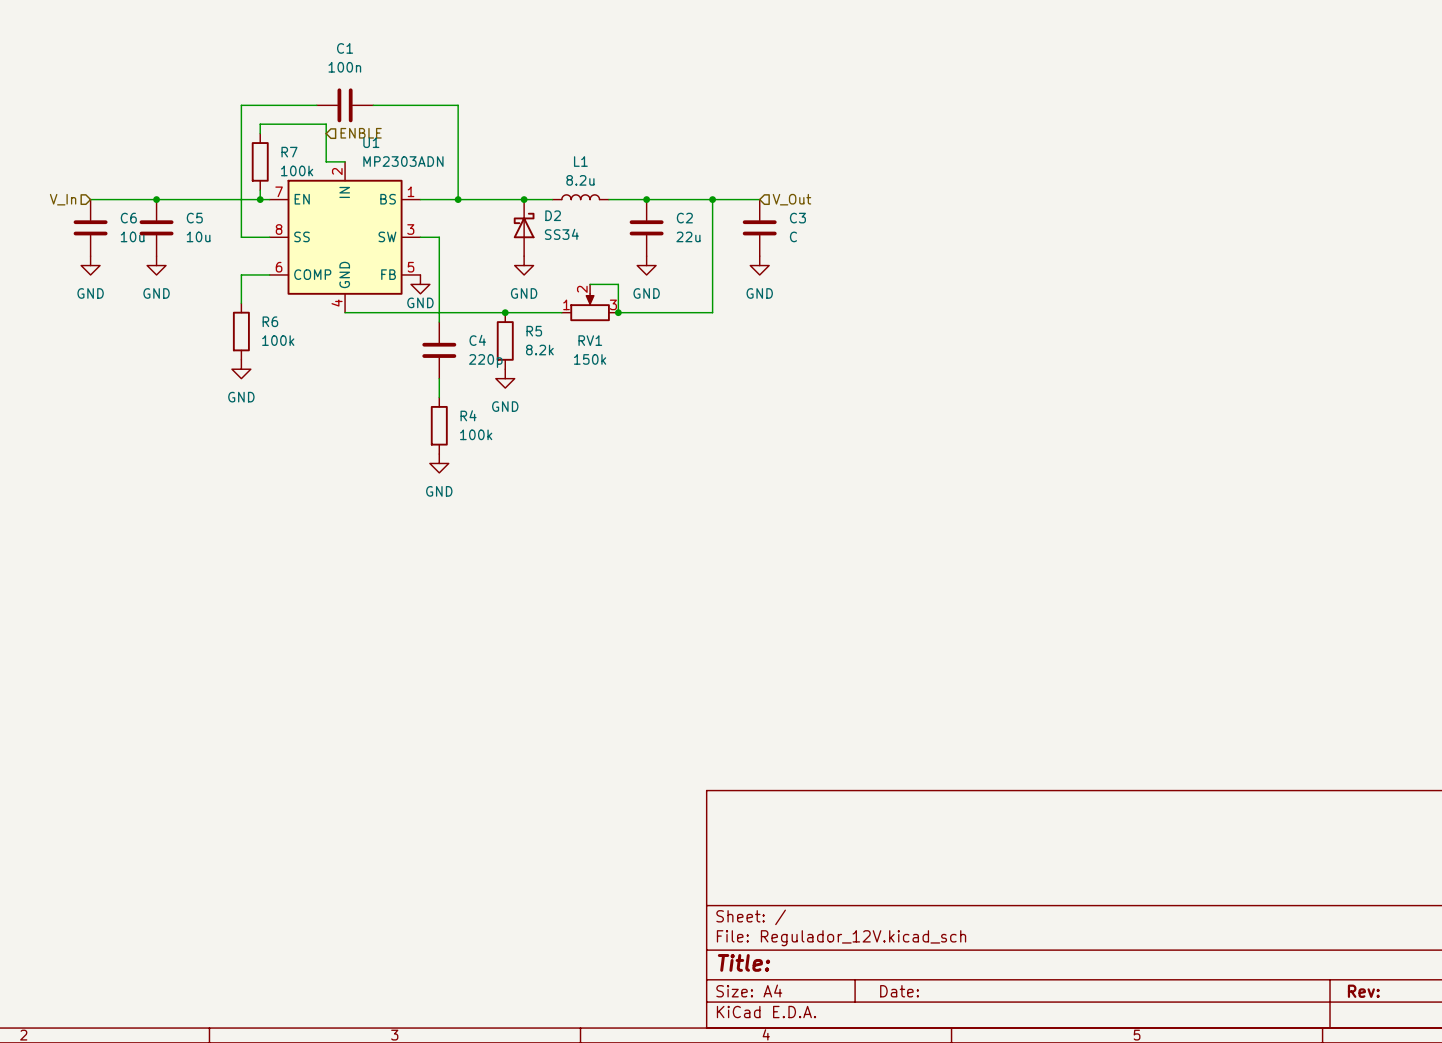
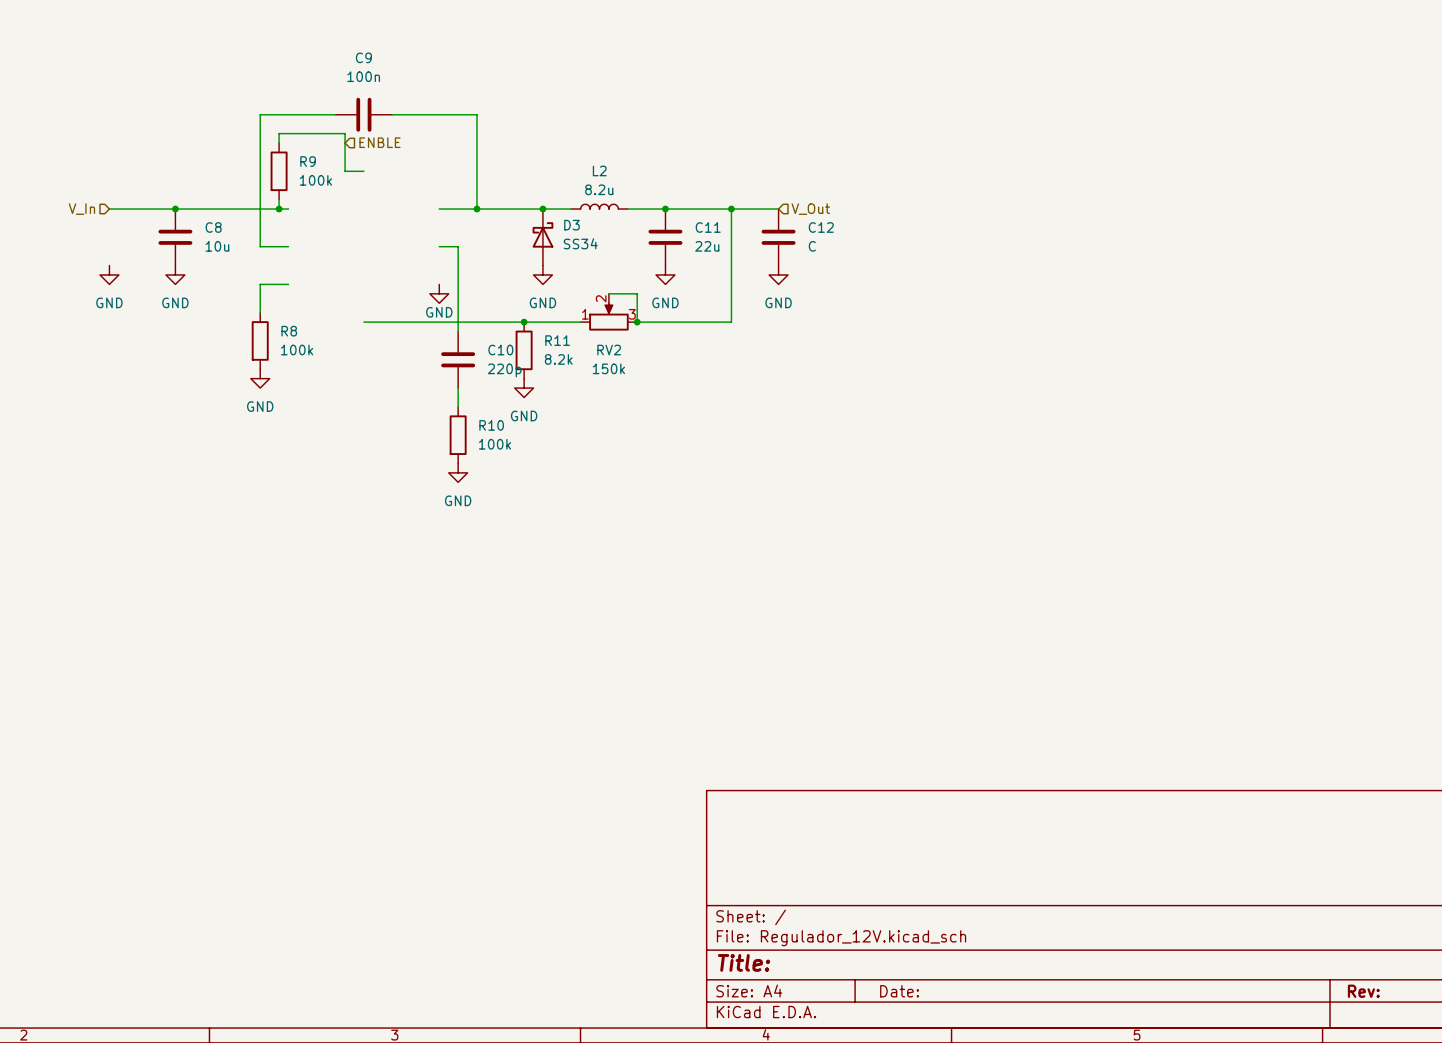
wire: (316, 105) (241, 105) (241, 237) (269, 237) -> none
C1: 100n (345, 105) -> none
wire: (373, 105) (458, 105) (458, 199) -> (392, 114) (476, 114) (476, 209)
C9: none -> 100n (363, 114)
wire: (260, 124) (326, 124) (326, 161) (345, 161) -> (260, 124) (260, 114) (335, 114)
wire: none -> (260, 133) (260, 190)
hierarchical label position: ENBLE (361, 133) -> ENBLE (379, 142)
wire: none -> (279, 143) (279, 133) (345, 133) (345, 171) (363, 171)
R7: 100k (260, 161) -> none
R9: none -> 100k (279, 171)
L1: 8.2u (580, 197) -> none
hierarchical label position: V_In (63, 199) -> V_In (81, 209)
wire: (90, 199) (269, 199) -> (109, 209) (288, 209)
junction position: (156, 199) -> (175, 209)
wire: none -> (260, 199) (260, 246) (288, 246)
junction position: (260, 199) -> (279, 209)
wire: none -> (279, 199) (279, 209)
wire: (420, 199) (552, 199) -> (439, 209) (571, 209)
junction position: (458, 199) -> (476, 209)
junction position: (524, 199) -> (542, 209)
wire: (608, 199) (759, 199) -> (627, 209) (778, 209)
junction position: (646, 199) -> (665, 209)
wire: (712, 199) (712, 312) (618, 312) (618, 284) (590, 284) -> (731, 209) (731, 322) (637, 322) (637, 293) (608, 293)
junction position: (712, 199) -> (731, 209)
hierarchical label position: V_Out (791, 199) -> V_Out (810, 209)
L2: none -> 8.2u (599, 206)
C6: 10u (90, 227) -> none
C5: 10u (156, 227) -> none
D2: SS34 (524, 227) -> none
C2: 22u (646, 227) -> none
C3: C (759, 227) -> none
C8: none -> 10u (175, 237)
U1: MP2303ADN (345, 237) -> none
wire: (420, 237) (439, 237) (439, 322) -> (439, 246) (458, 246) (458, 331)
D3: none -> SS34 (542, 237)
C11: none -> 22u (665, 237)
C12: none -> C (778, 237)
power symbol position: GND (90, 265) -> GND (109, 274)
power symbol position: GND (156, 265) -> GND (175, 274)
power symbol position: GND (524, 265) -> GND (542, 274)
power symbol position: GND (646, 265) -> GND (665, 274)
power symbol position: GND (759, 265) -> GND (778, 274)
wire: (269, 274) (241, 274) (241, 303) -> (288, 284) (260, 284) (260, 312)
power symbol position: GND (420, 284) -> GND (439, 293)
RV1: 150k (590, 302) -> none
wire: (345, 312) (561, 312) -> (363, 322) (580, 322)
junction position: (505, 312) -> (524, 322)
RV2: none -> 150k (608, 312)
junction position: (618, 312) -> (637, 322)
R6: 100k (241, 331) -> none
R8: none -> 100k (260, 340)
R5: 8.2k (505, 340) -> none
C4: 220p (439, 350) -> none
R11: none -> 8.2k (524, 350)
C10: none -> 220p (458, 359)
power symbol position: GND (241, 369) -> GND (260, 378)
wire: (439, 378) (439, 397) -> (458, 388) (458, 406)
power symbol position: GND (505, 378) -> GND (524, 388)
R4: 100k (439, 425) -> none
R10: none -> 100k (458, 435)
power symbol position: GND (439, 463) -> GND (458, 472)

